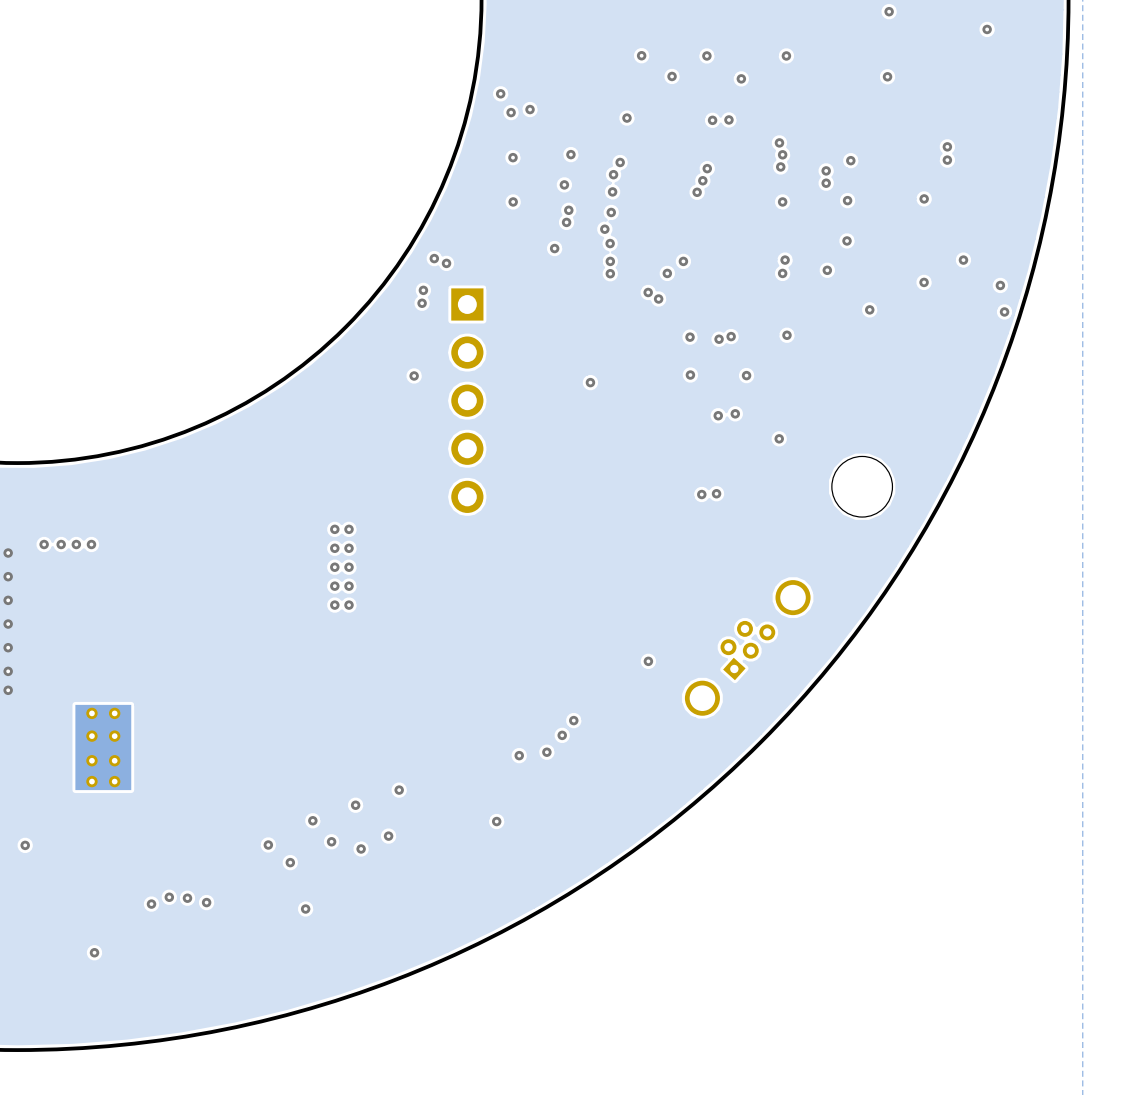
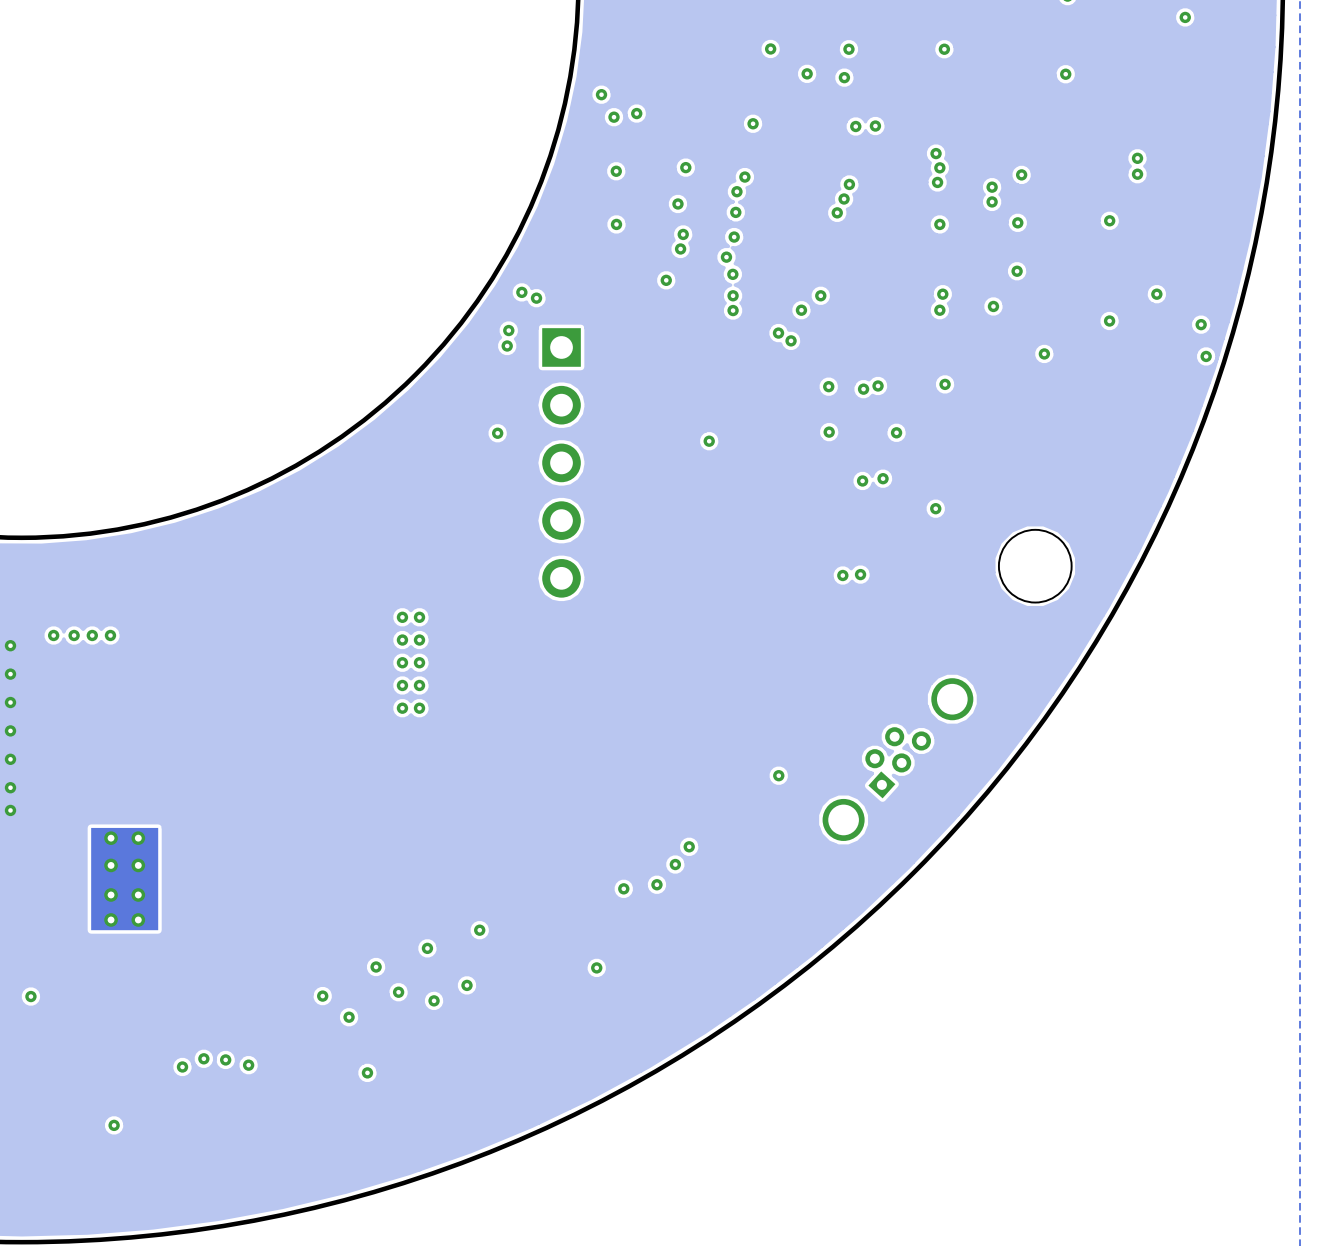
via position: (741, 78) -> (844, 77)

